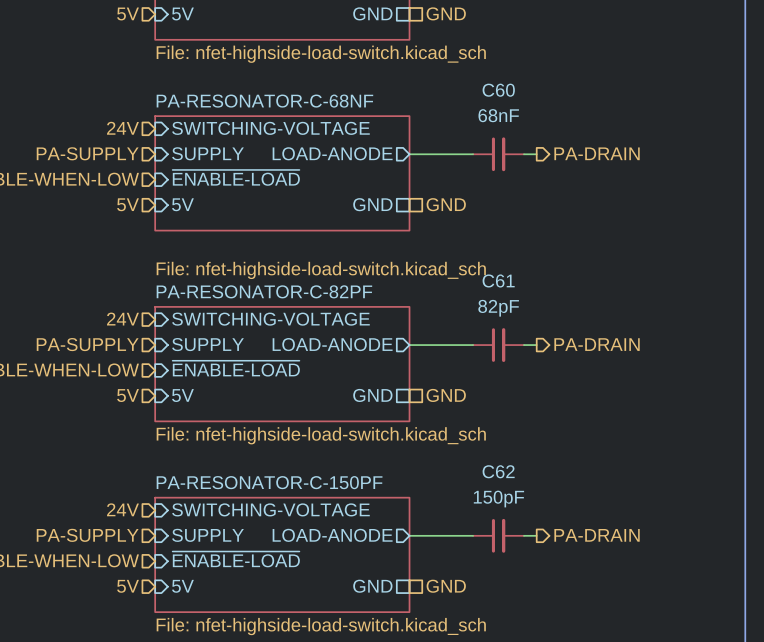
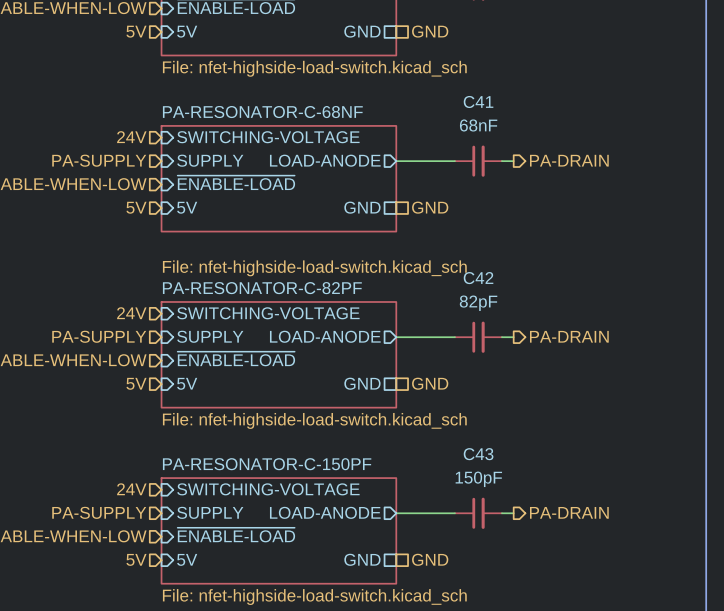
C60 name: C60 (498, 90) -> C41 (478, 102)
C61 name: C61 (498, 280) -> C42 (478, 278)
C62 name: C62 (498, 471) -> C43 (478, 454)

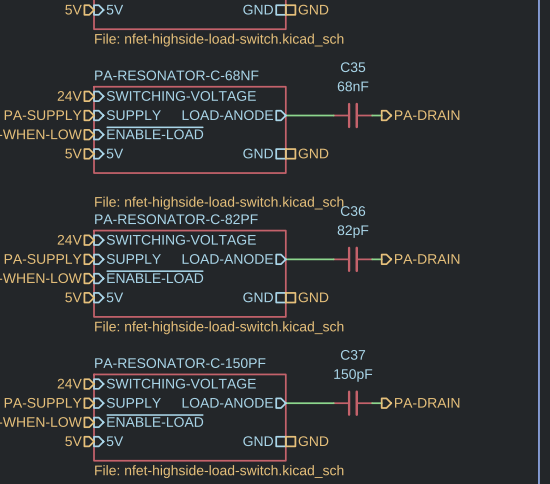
C41 name: C41 (478, 102) -> C35 (353, 67)
C42 name: C42 (478, 278) -> C36 (353, 211)
C43 name: C43 (478, 454) -> C37 (352, 354)

